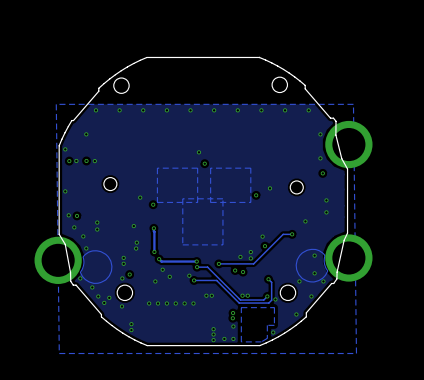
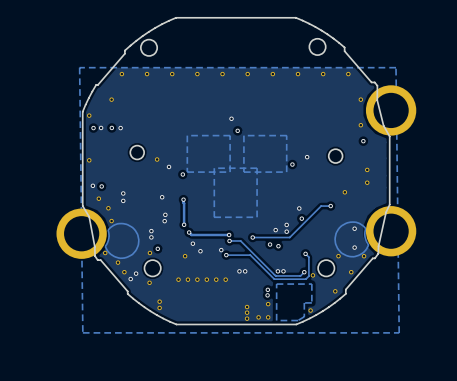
part: none -> (157, 159)

